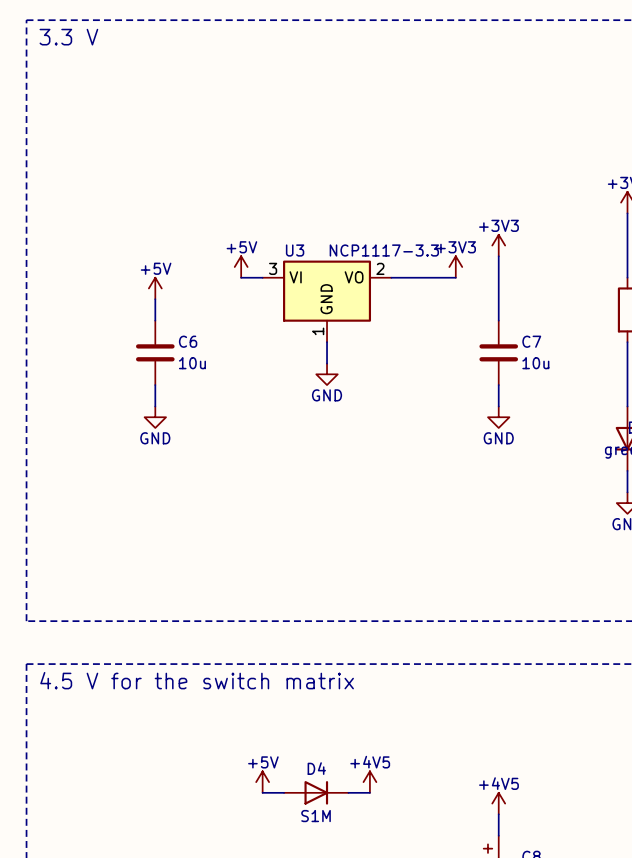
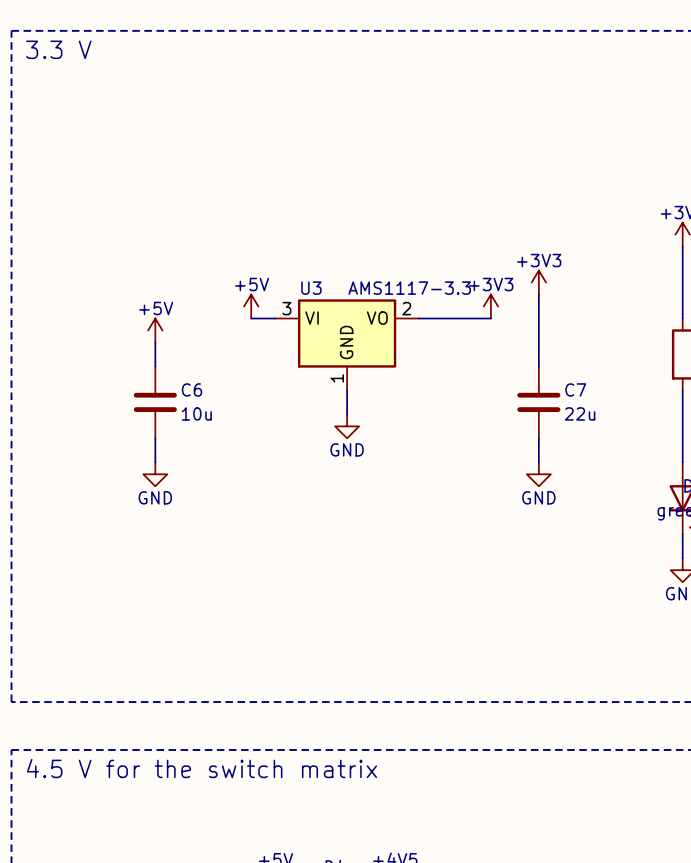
U3 value: NCP1117-3.3 (384, 250) -> AMS1117-3.3 (409, 288)
C7 value: 10u (535, 363) -> 22u (580, 413)

